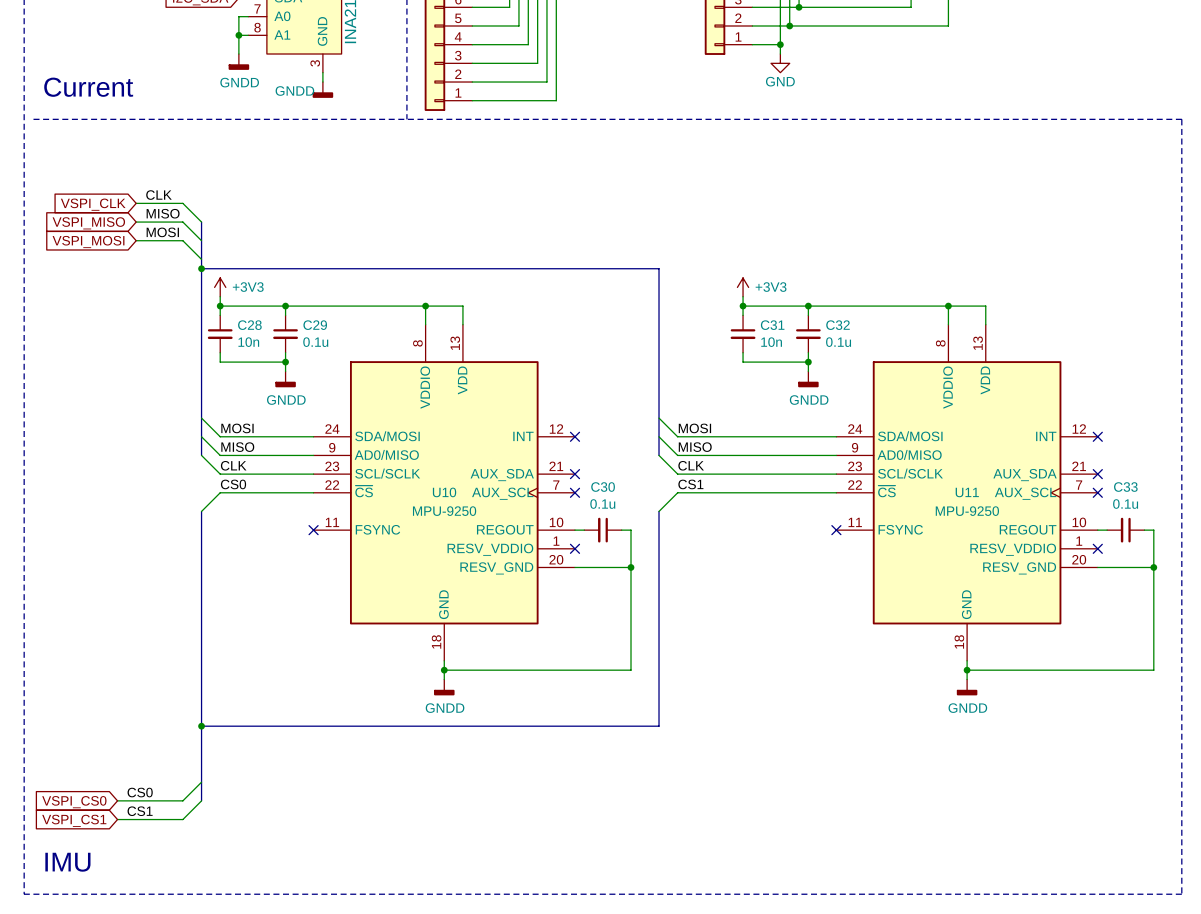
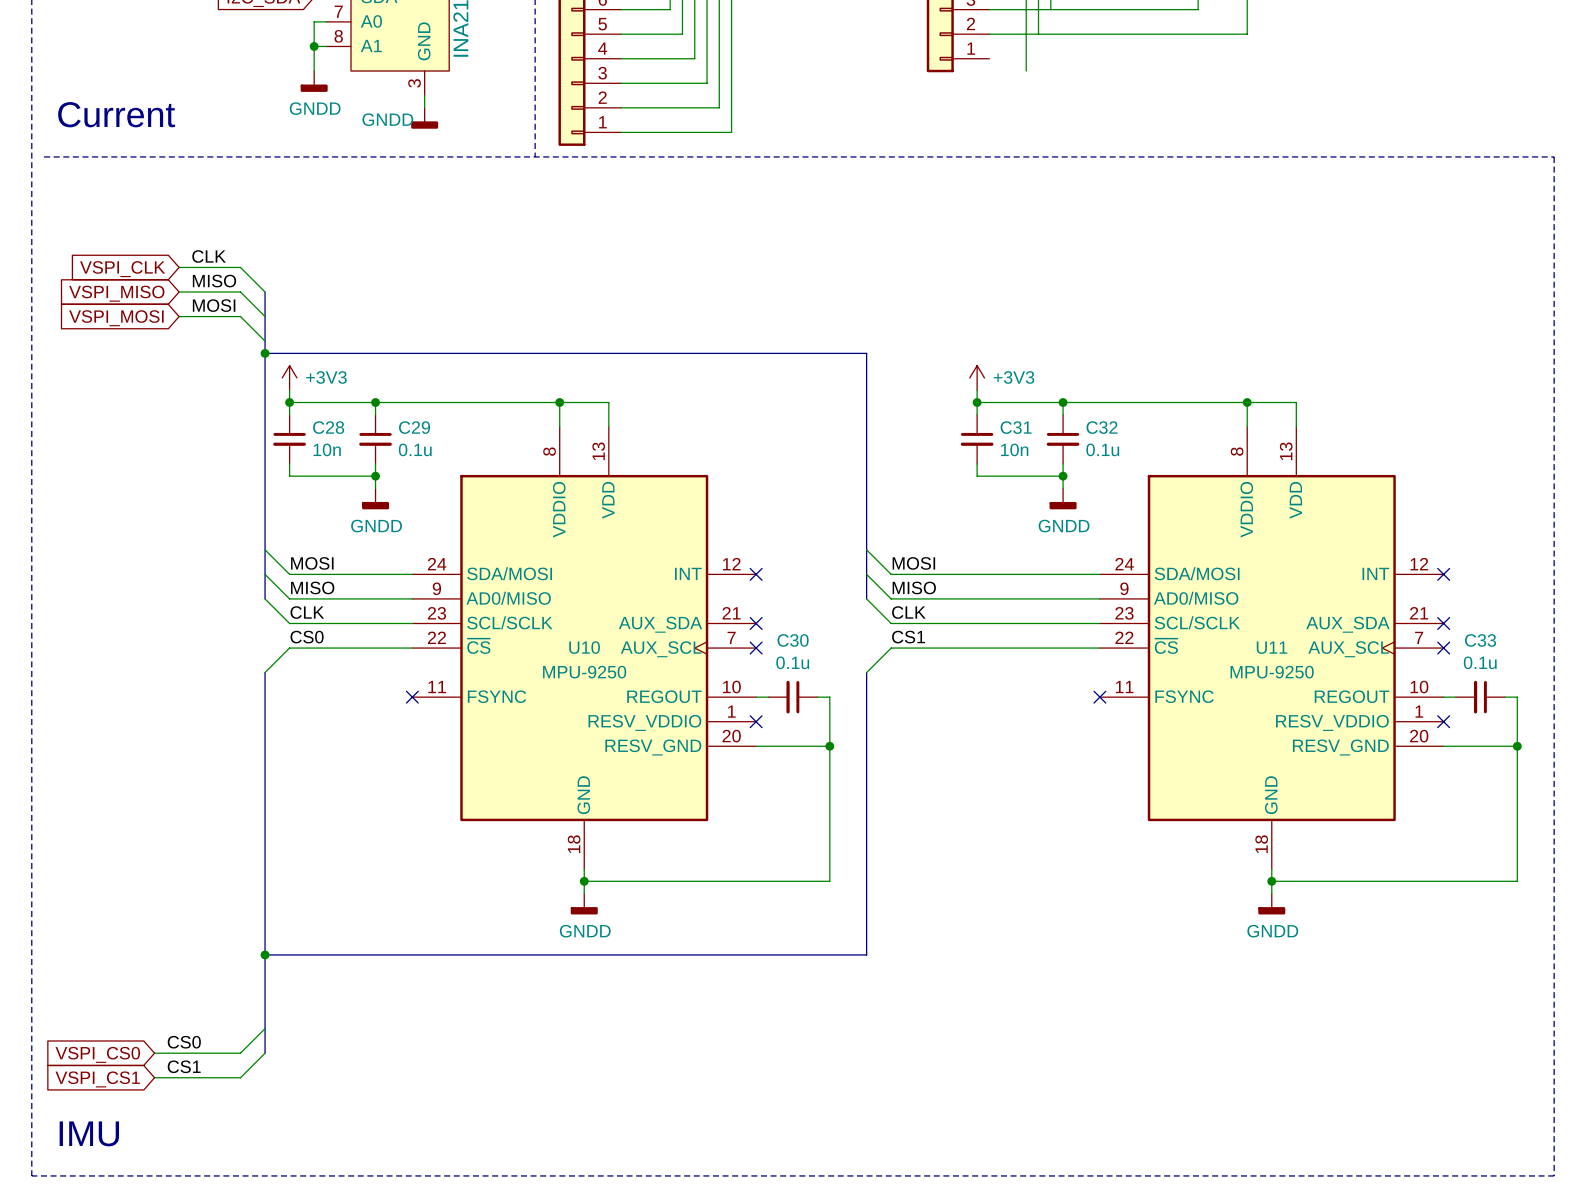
junction: (799, 7) -> none
junction: (789, 25) -> none
wire: (752, 44) (780, 44) -> none
junction: (780, 44) -> none
power symbol: GND (780, 63) -> none

